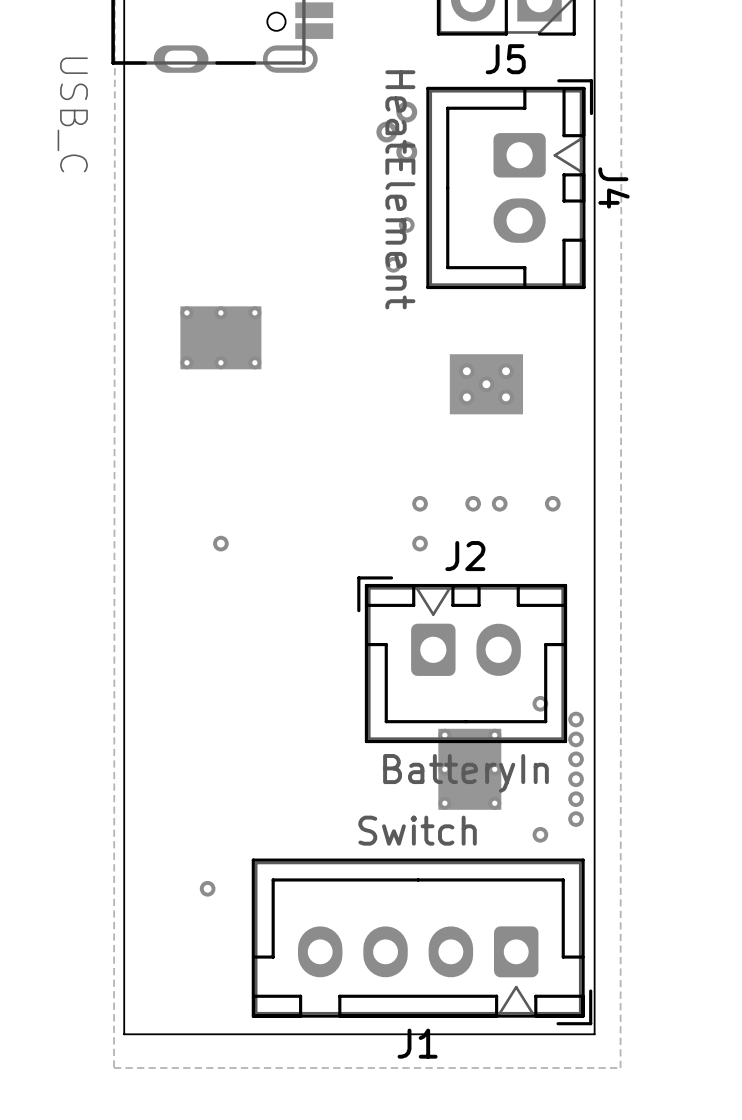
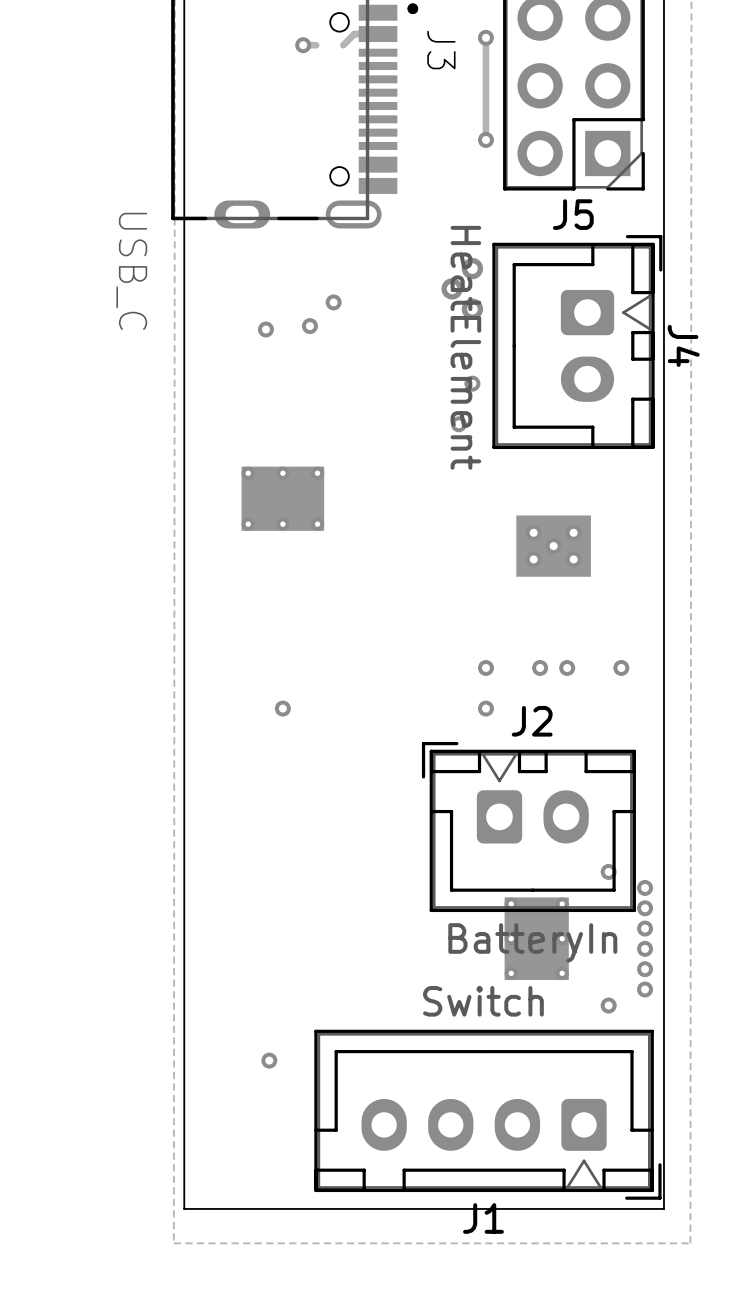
via: none -> (333, 302)
via: none -> (309, 326)
via: none -> (265, 329)

